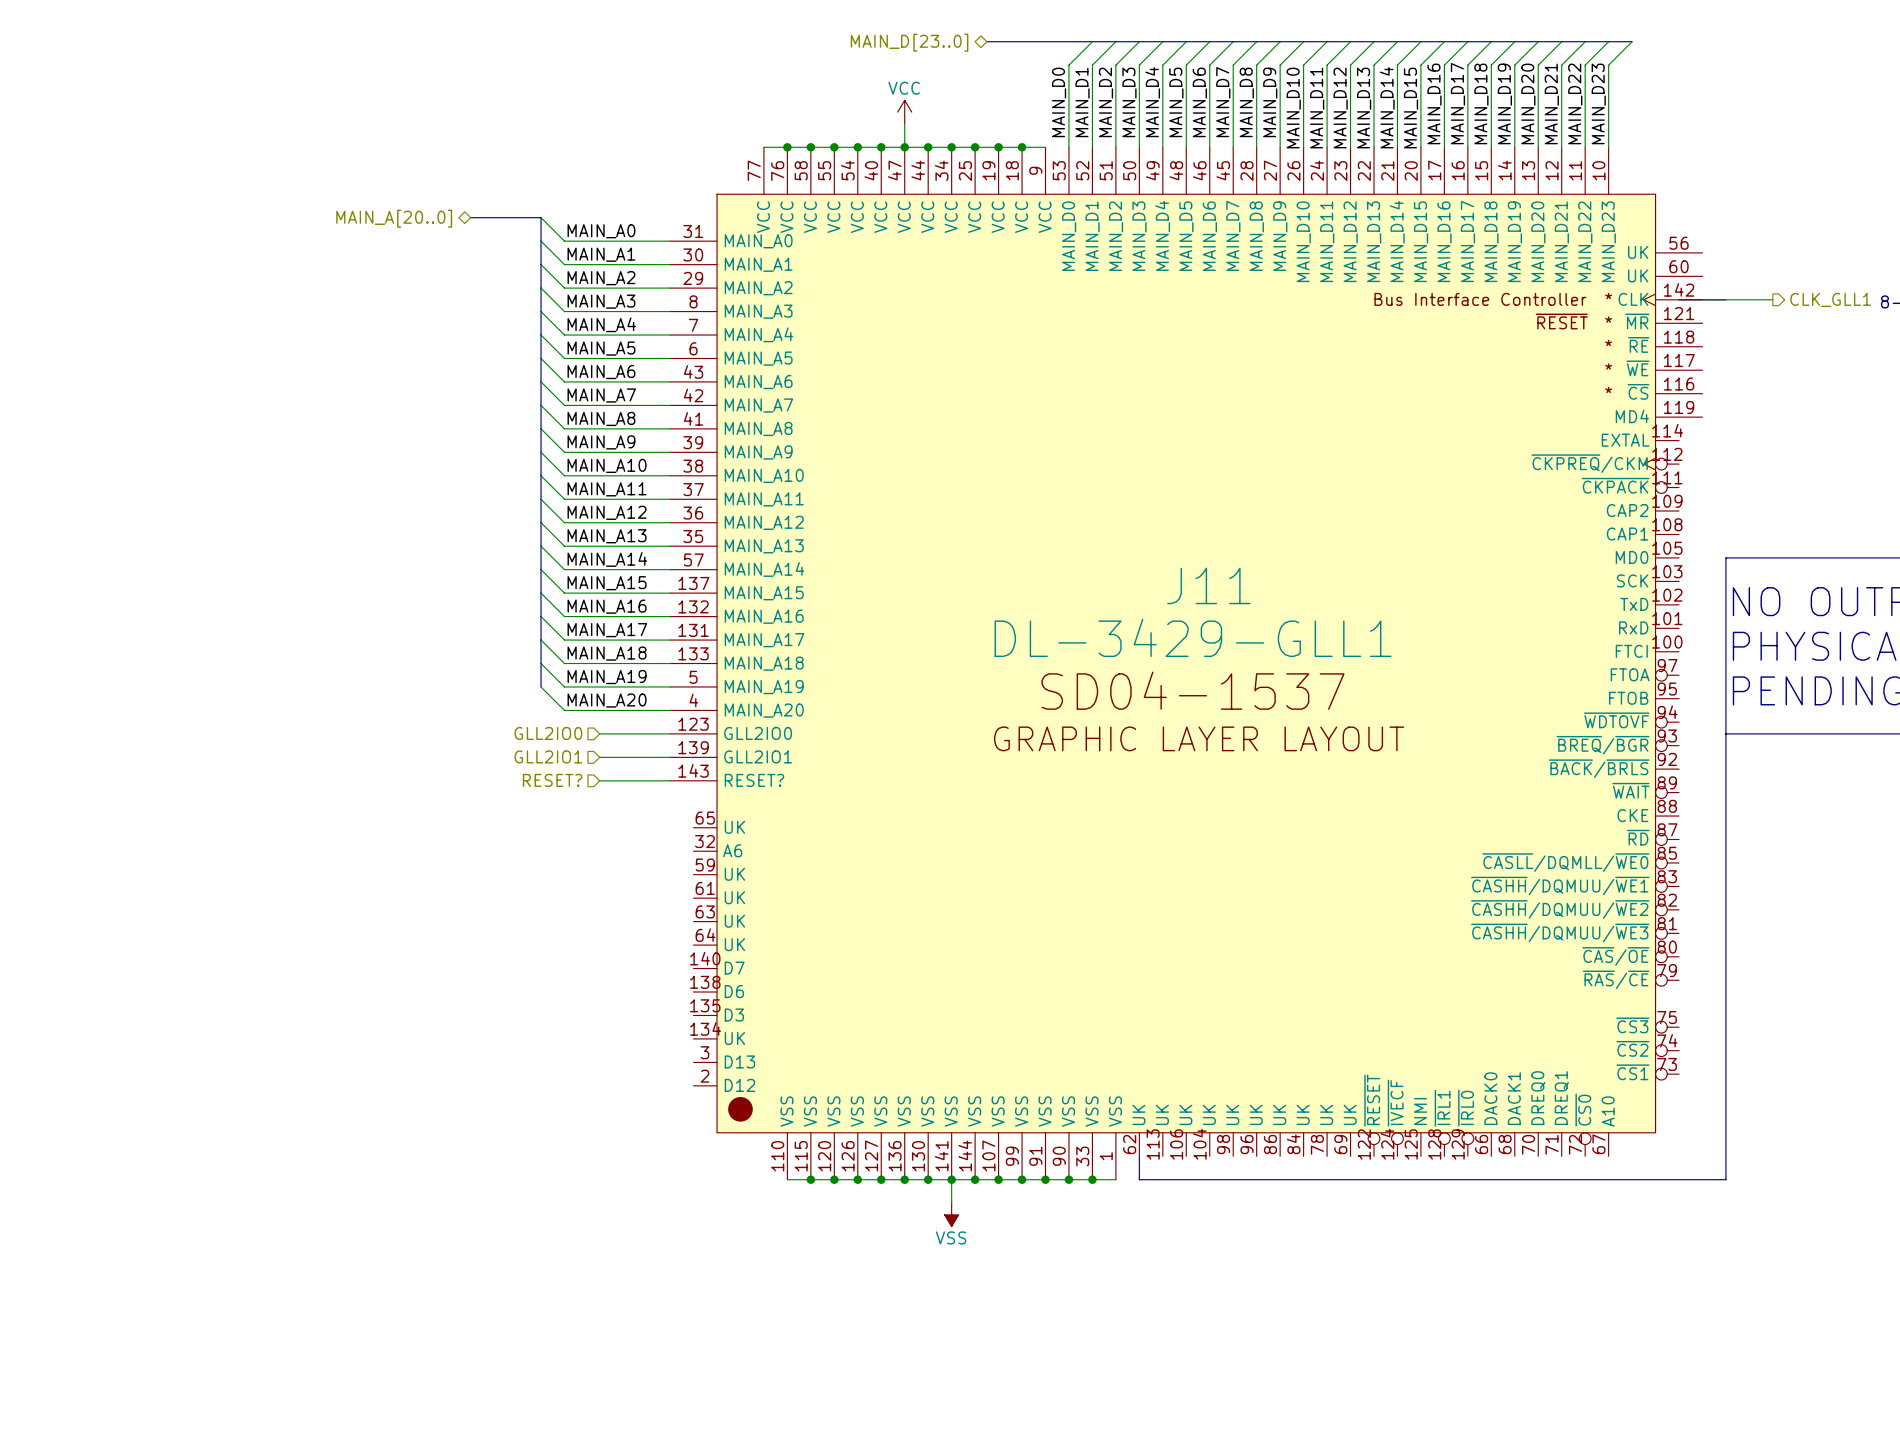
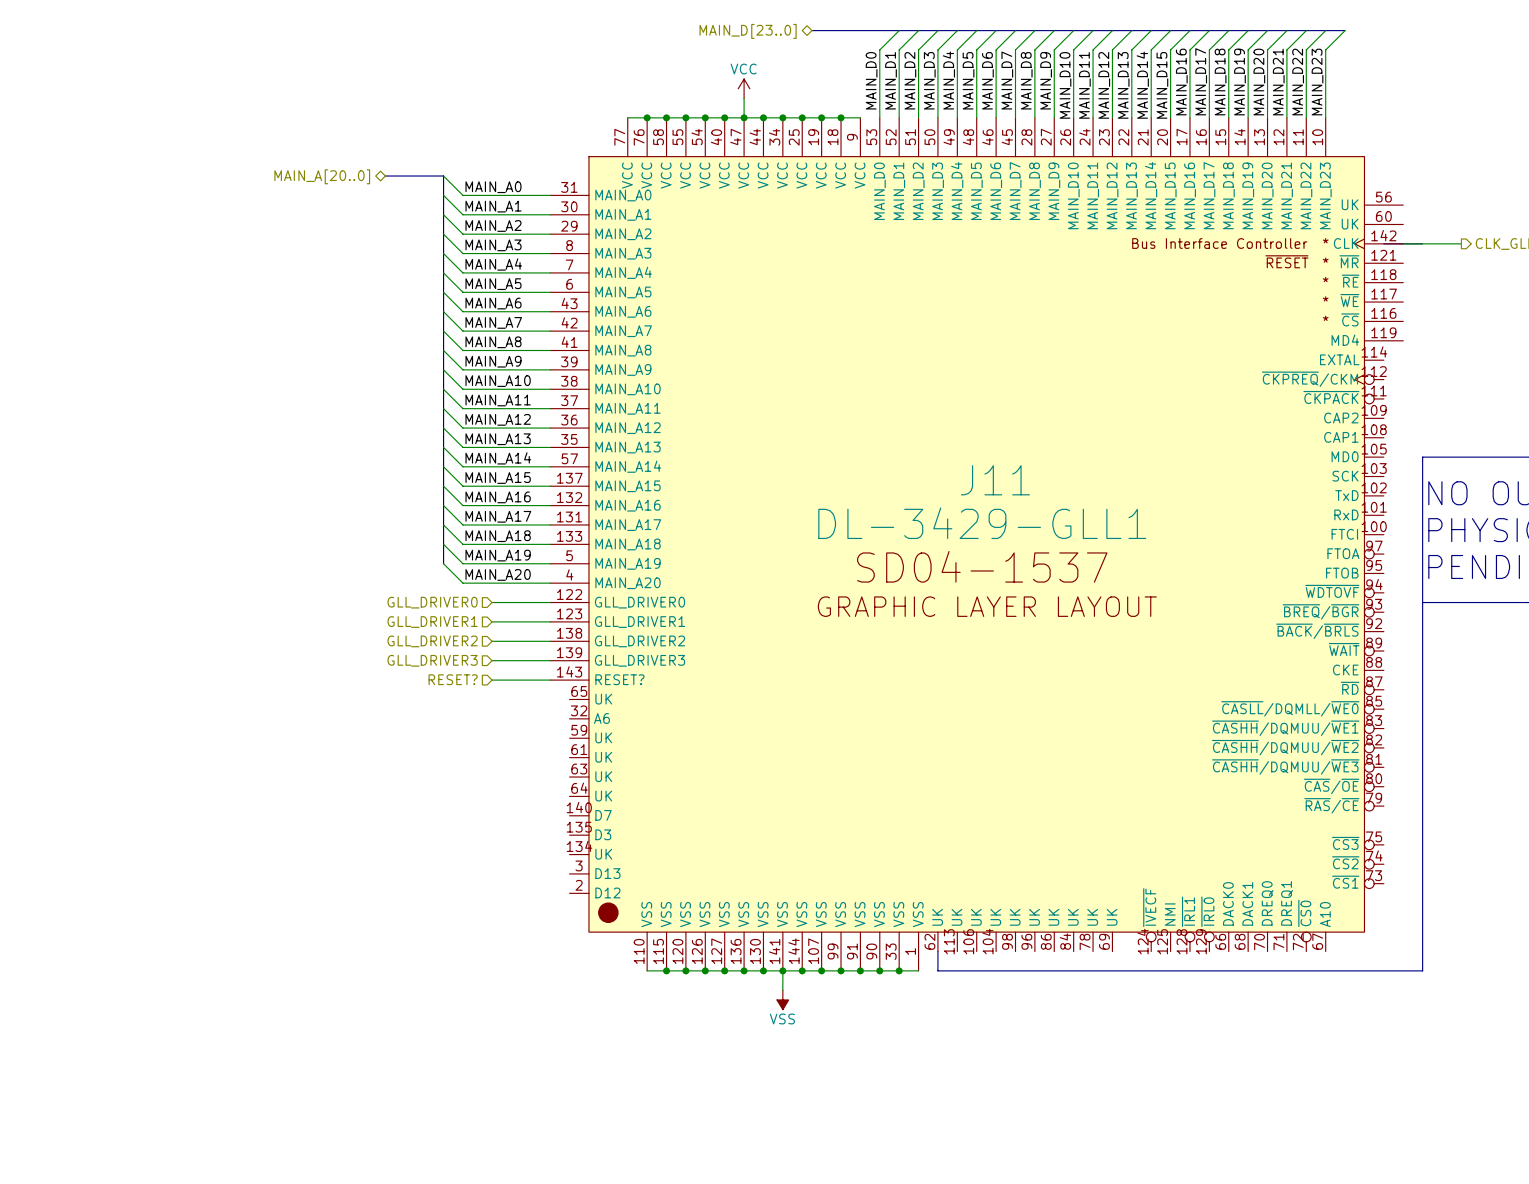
J11 symbol: [670, 147, 1703, 1180] -> [550, 117, 1404, 971]
hierarchical label: GLL2IO0 (548, 733) -> GLL_DRIVER0 (432, 602)
hierarchical label: GLL2IO1 (548, 756) -> GLL_DRIVER1 (432, 622)
hierarchical label: RESET? (552, 780) -> GLL_DRIVER2 (432, 641)
hierarchical label: none -> GLL_DRIVER3 (432, 660)
wire: none -> (492, 660) (550, 660)
hierarchical label: none -> RESET? (453, 679)
wire: none -> (492, 680) (550, 680)

